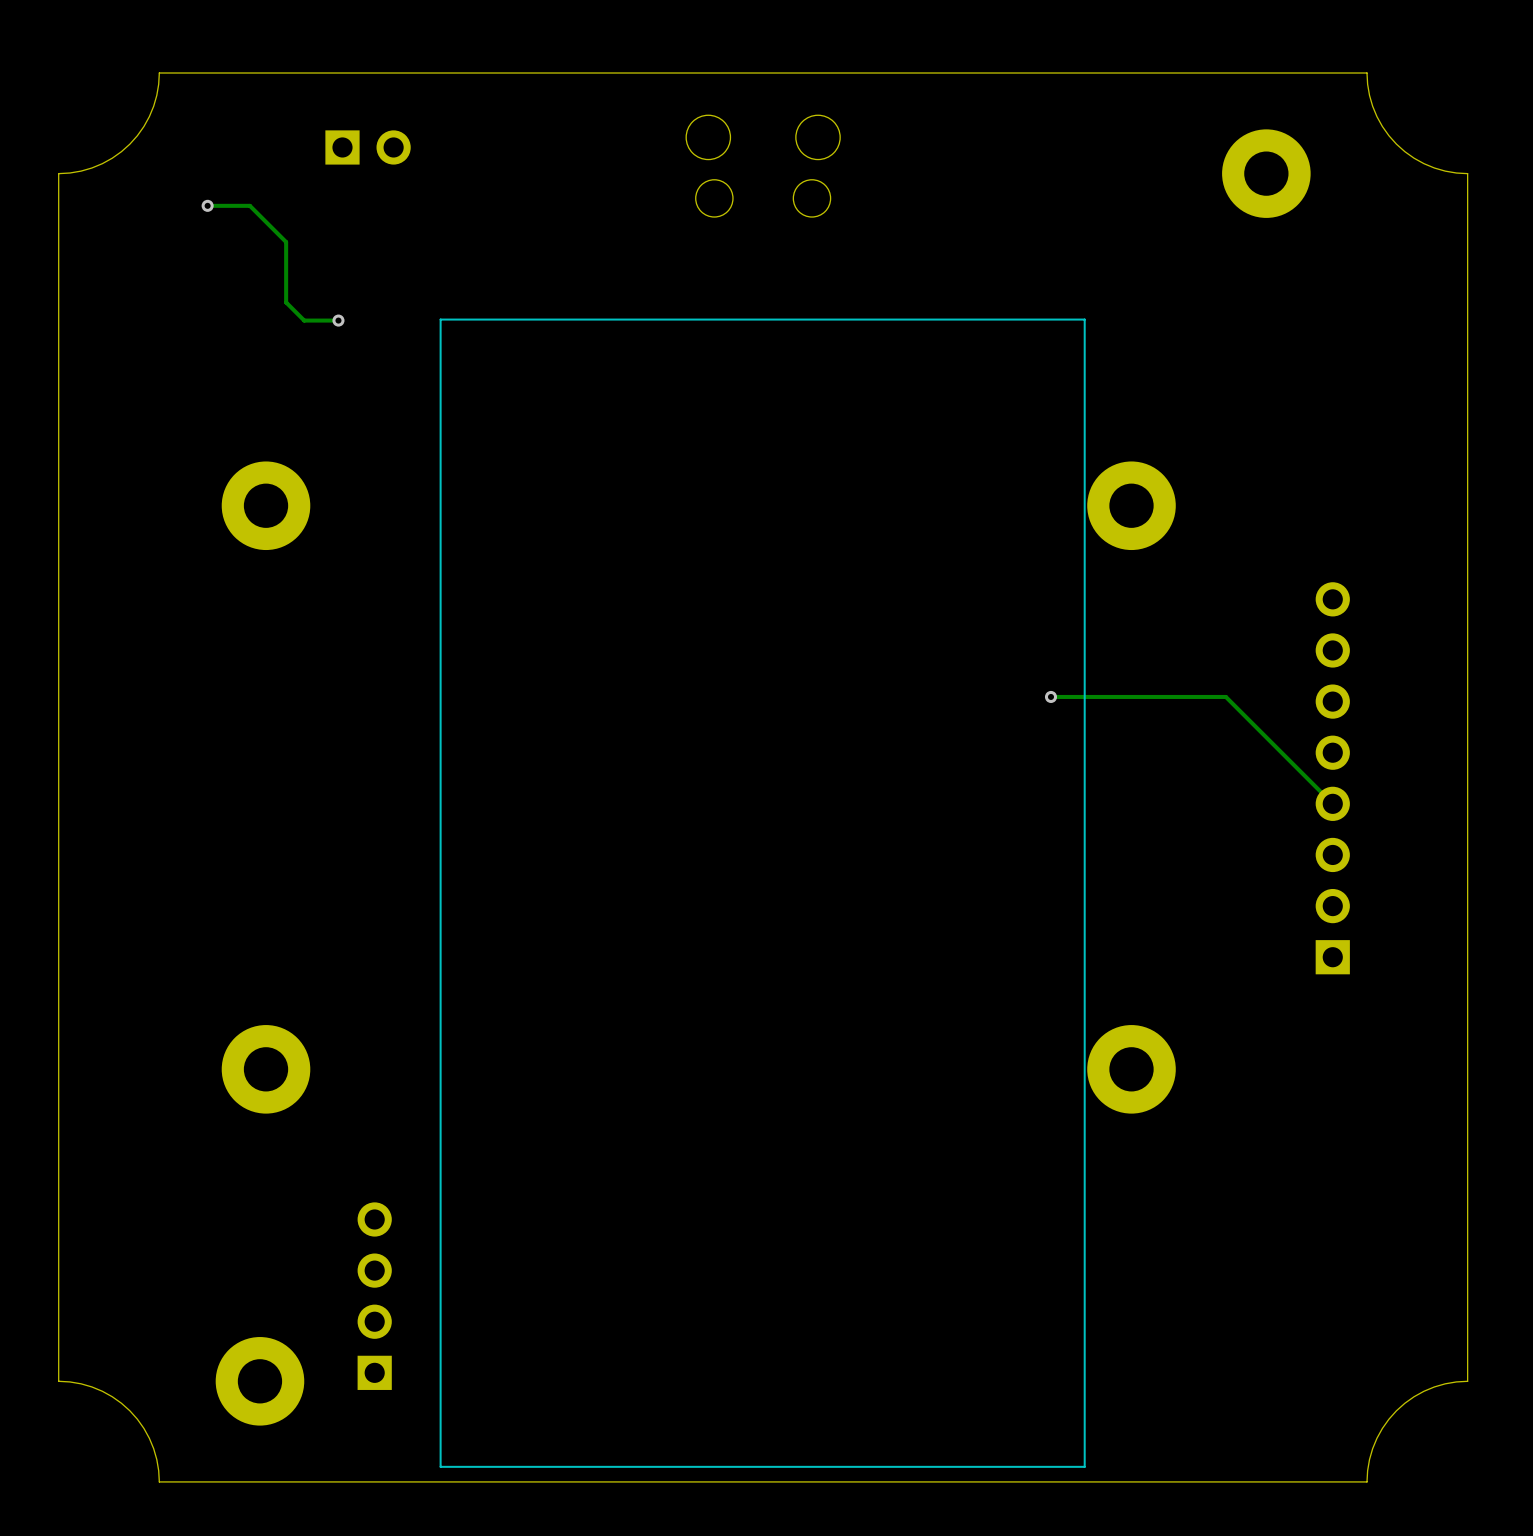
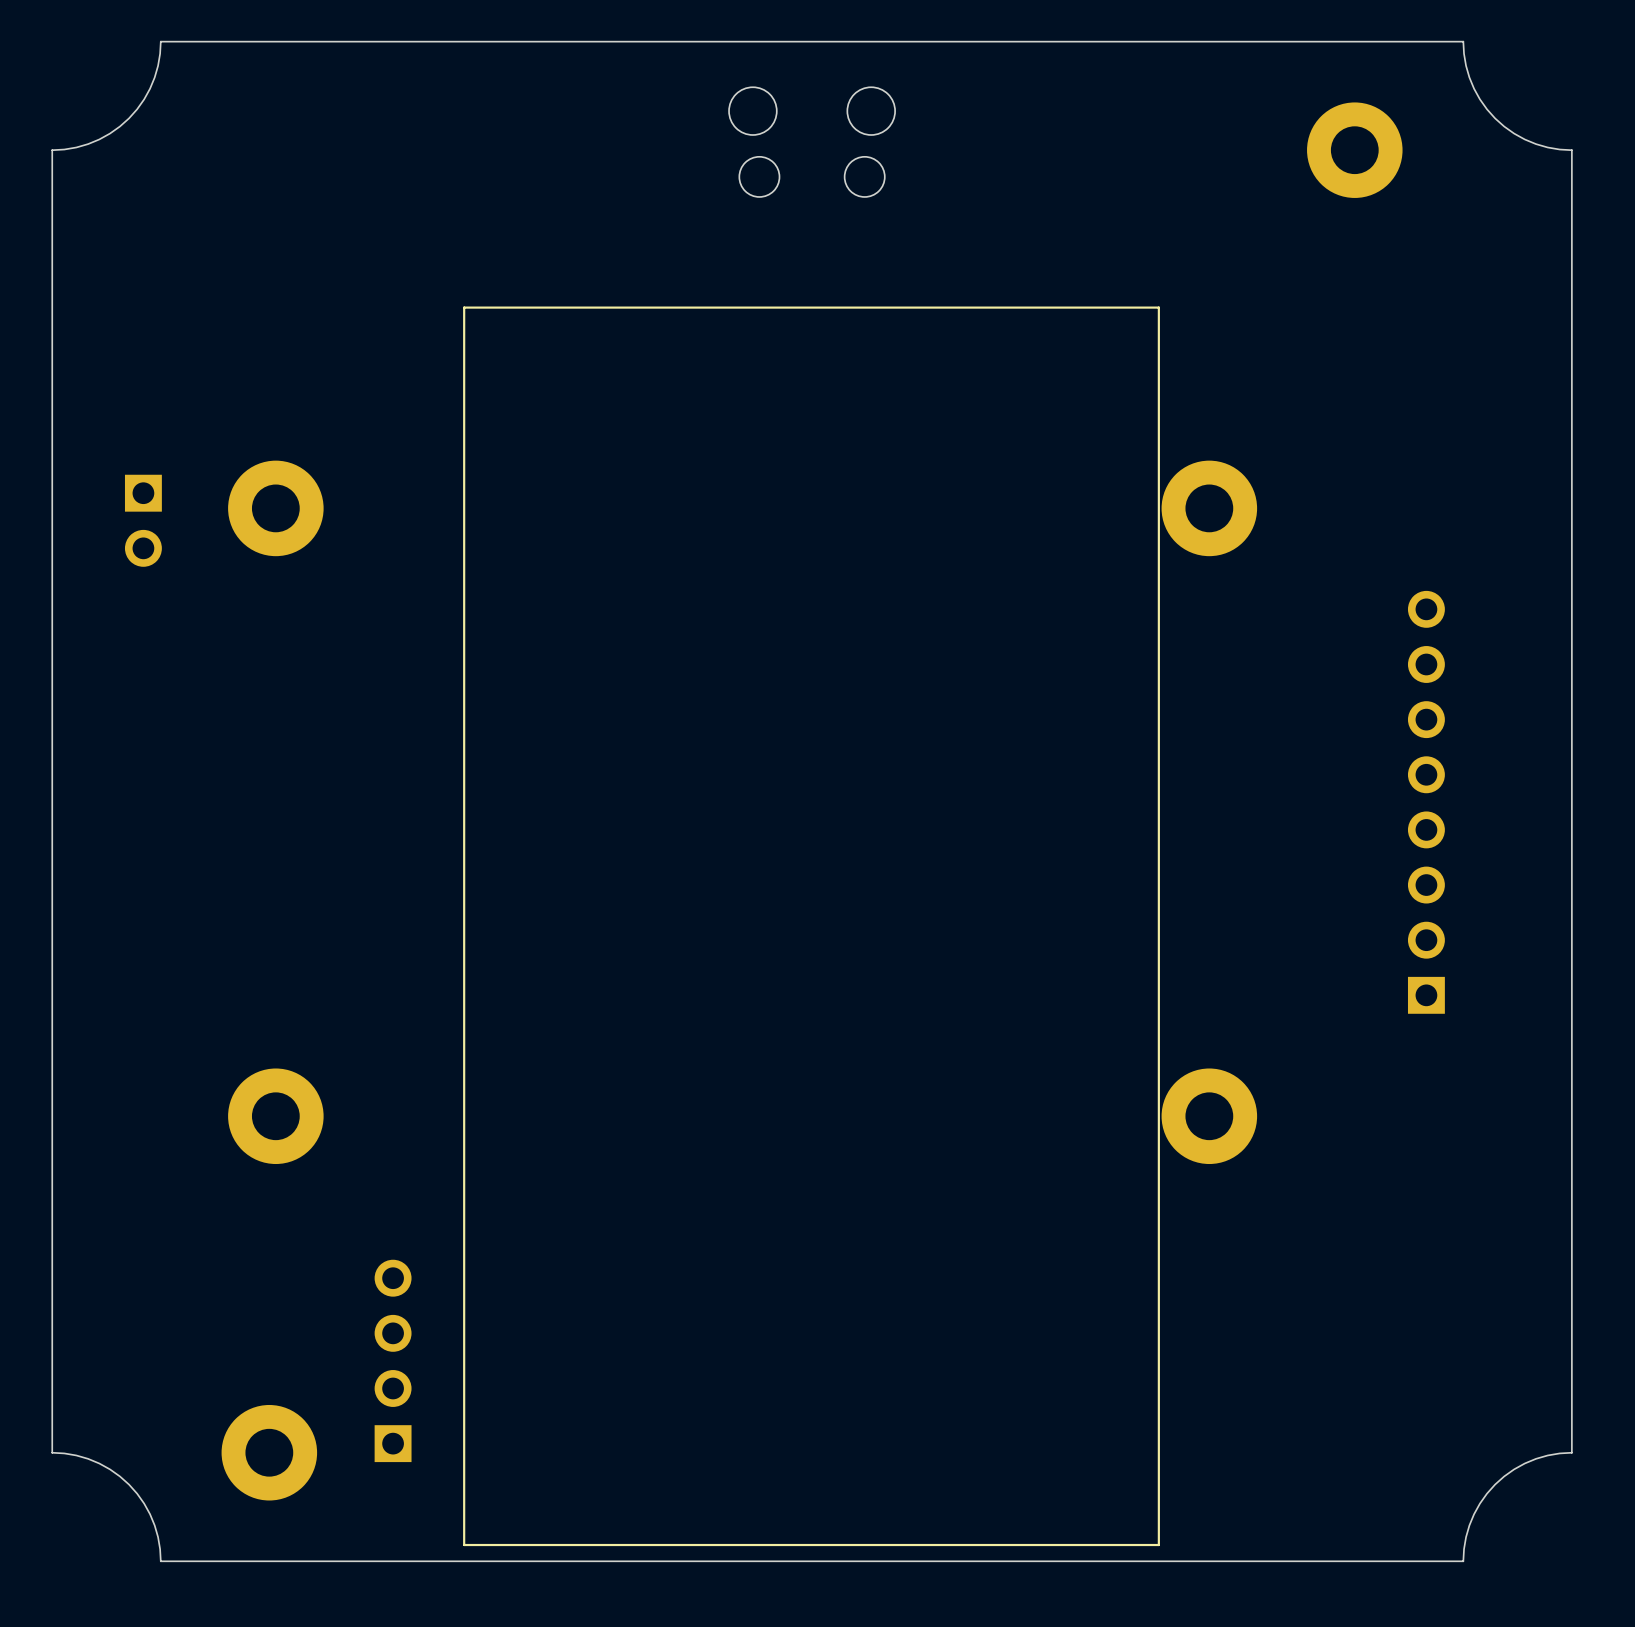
part rotation: 0° (368, 147) -> 90° clockwise (143, 520)
part position: (368, 147) -> (143, 520)
track: (207, 205) (249, 205) (286, 242) (286, 302) (304, 320) (338, 320) -> none
via: (207, 205) -> none
via: (338, 320) -> none
track: (1050, 696) (1225, 696) (1332, 803) -> none
via: (1050, 696) -> none

